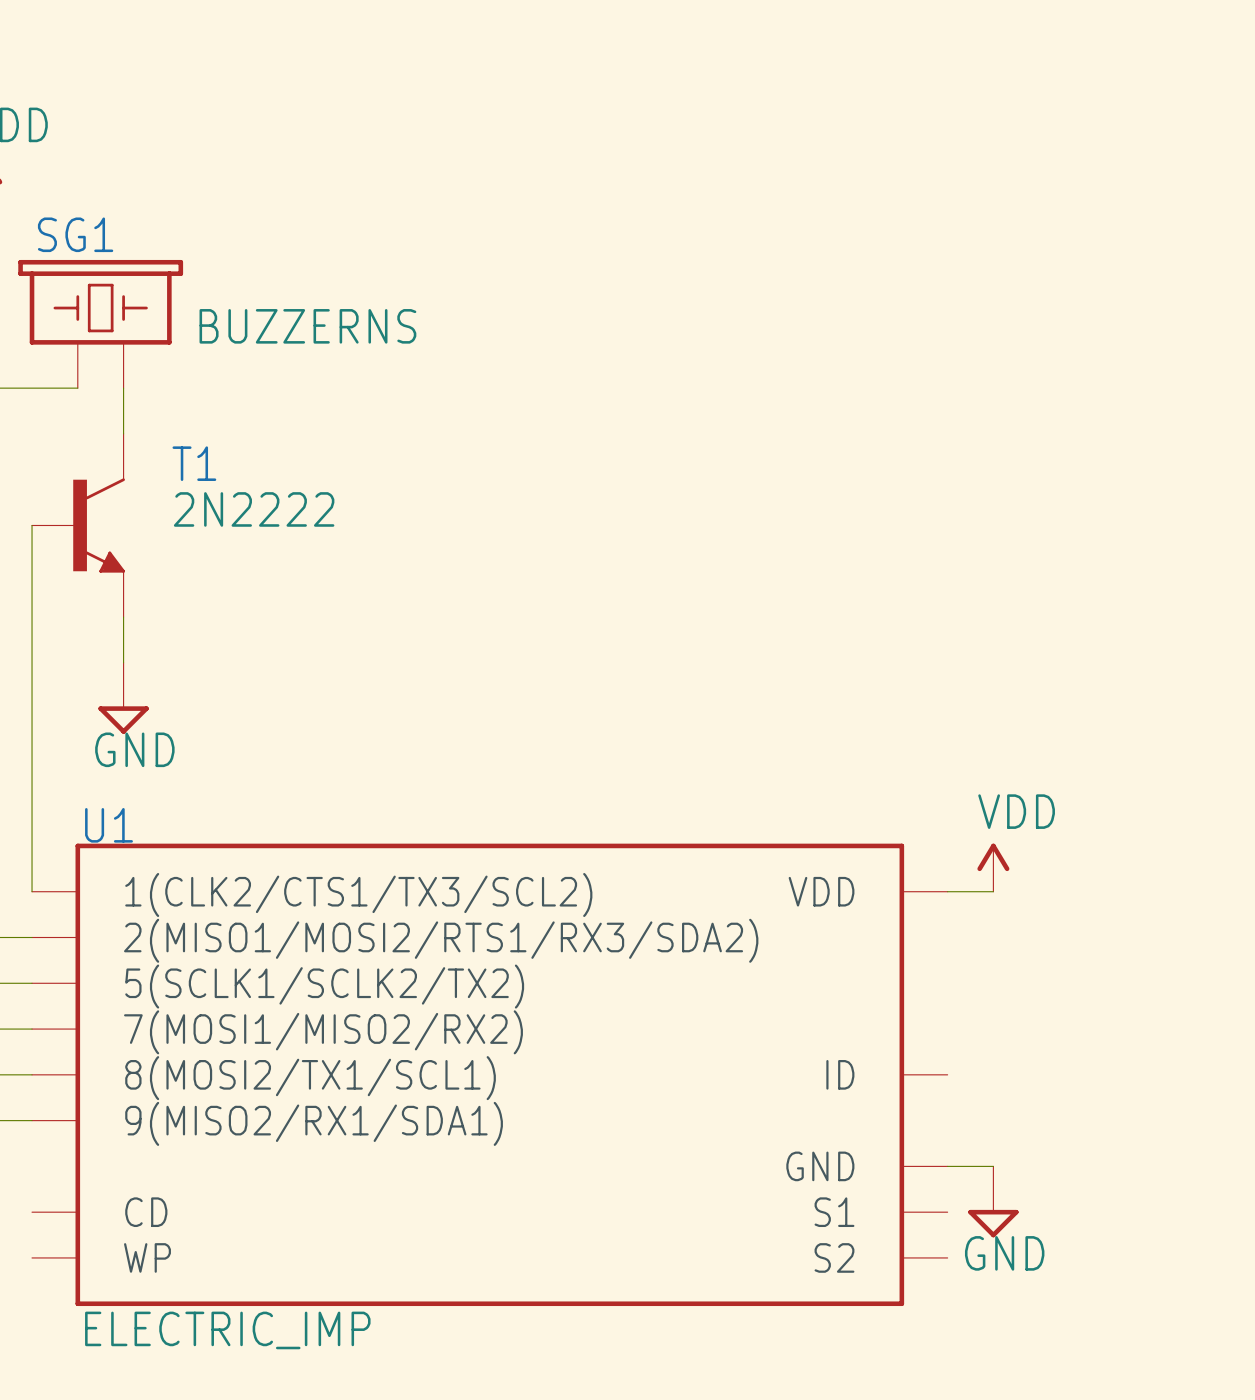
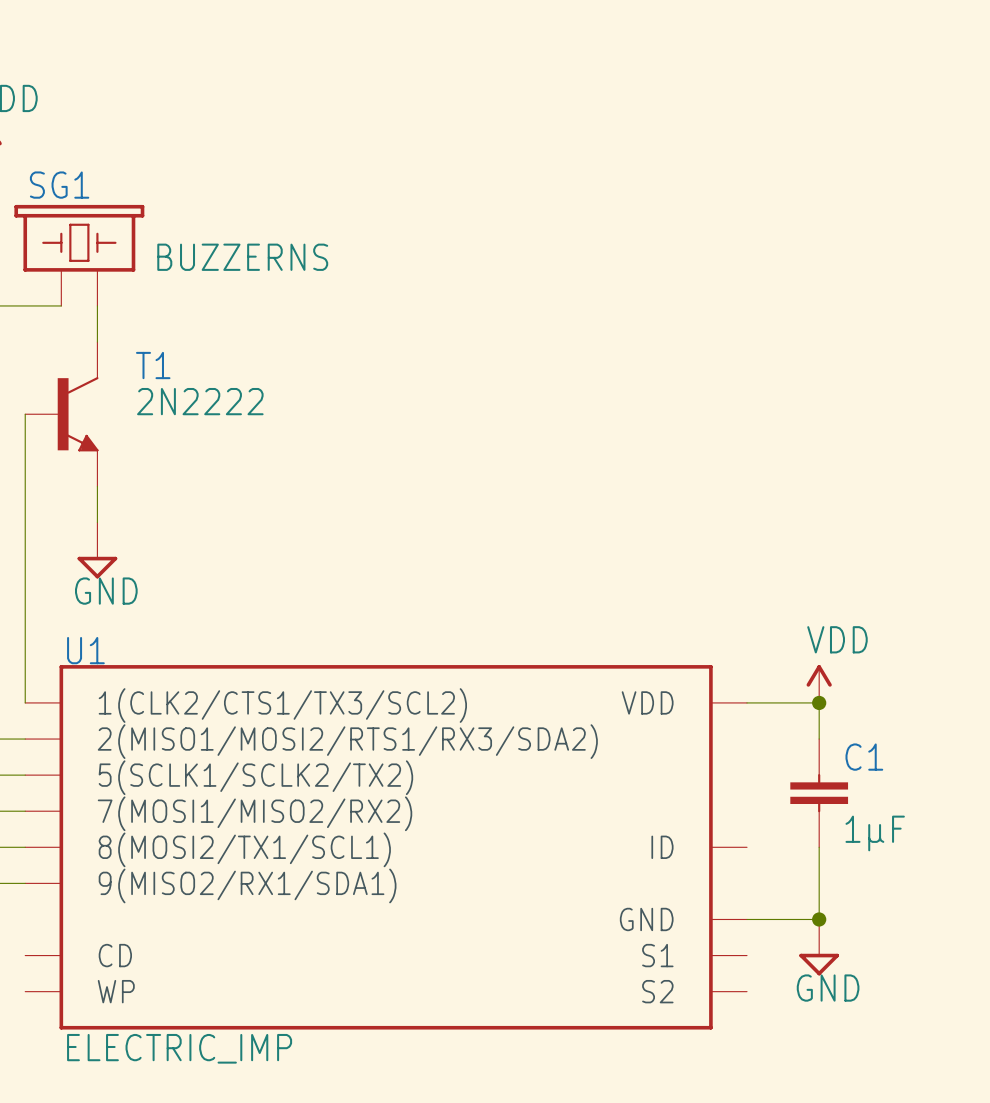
power symbol position: VDD (993, 867) -> VDD (819, 684)
wire: none -> (783, 702) (819, 702) (819, 739)
junction: none -> (819, 702)
C1: none -> 1µF (819, 793)
wire: none -> (819, 847) (819, 919) (783, 919)
junction: none -> (819, 919)
power symbol position: GND (993, 1201) -> GND (819, 947)

